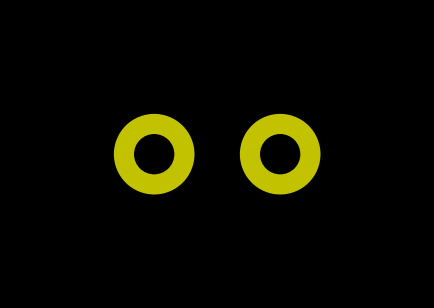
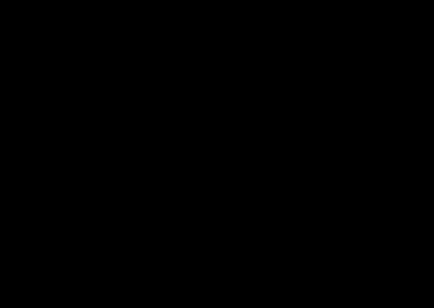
part: (217, 154) -> none

